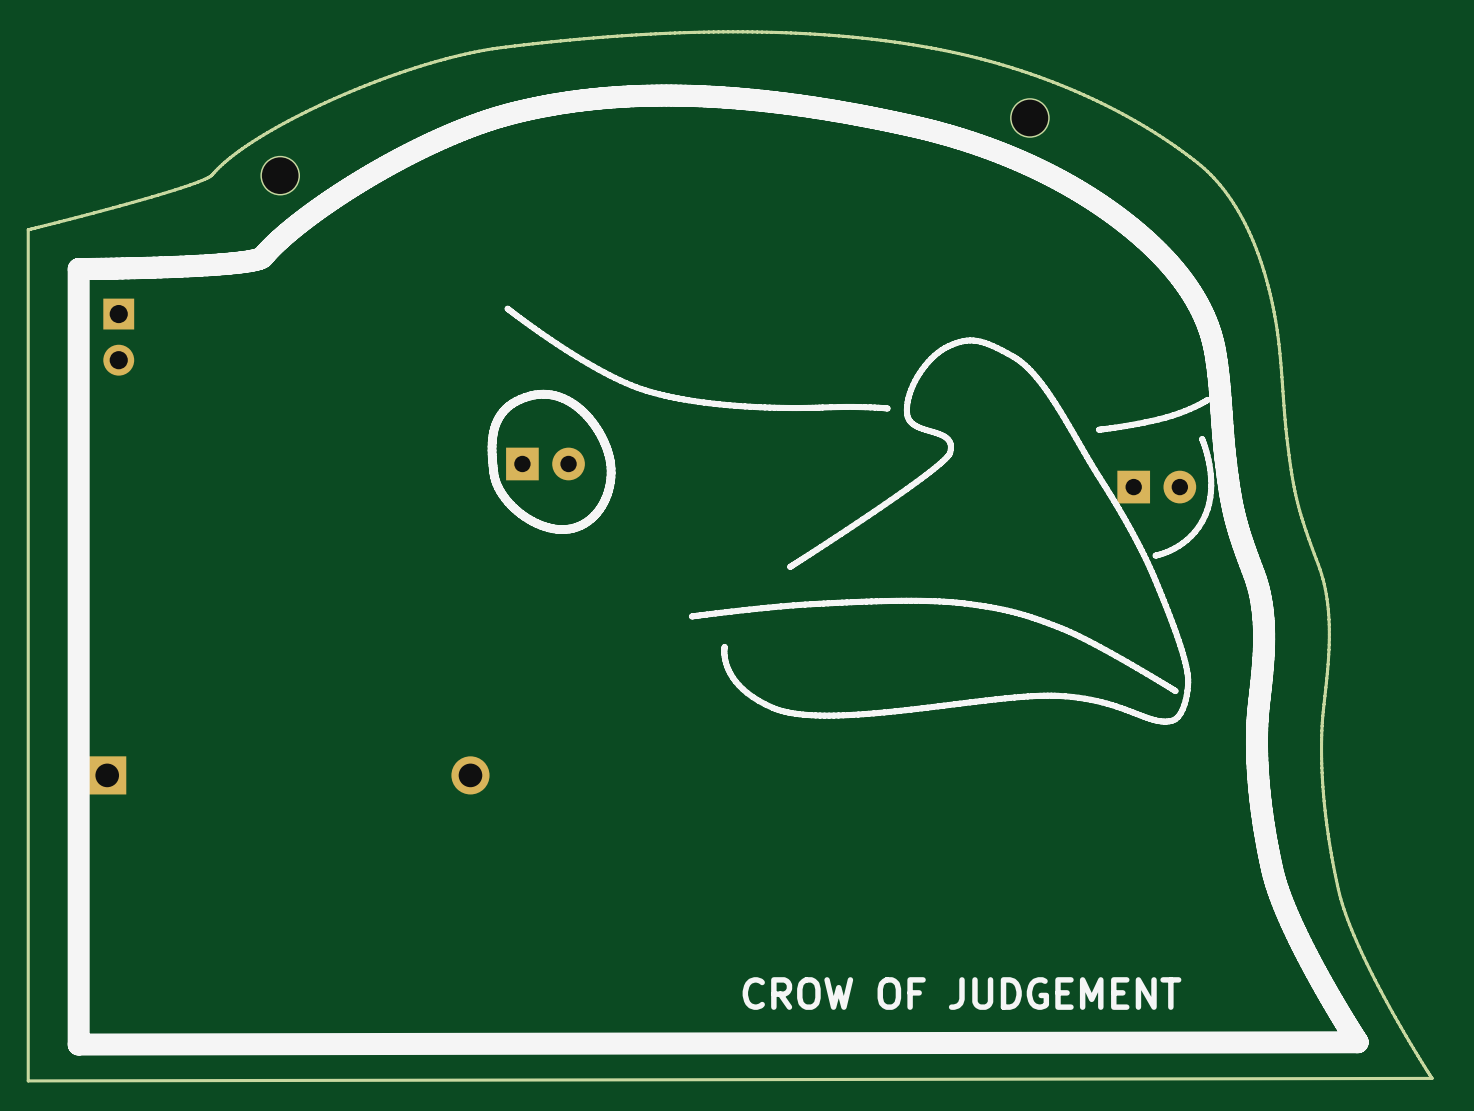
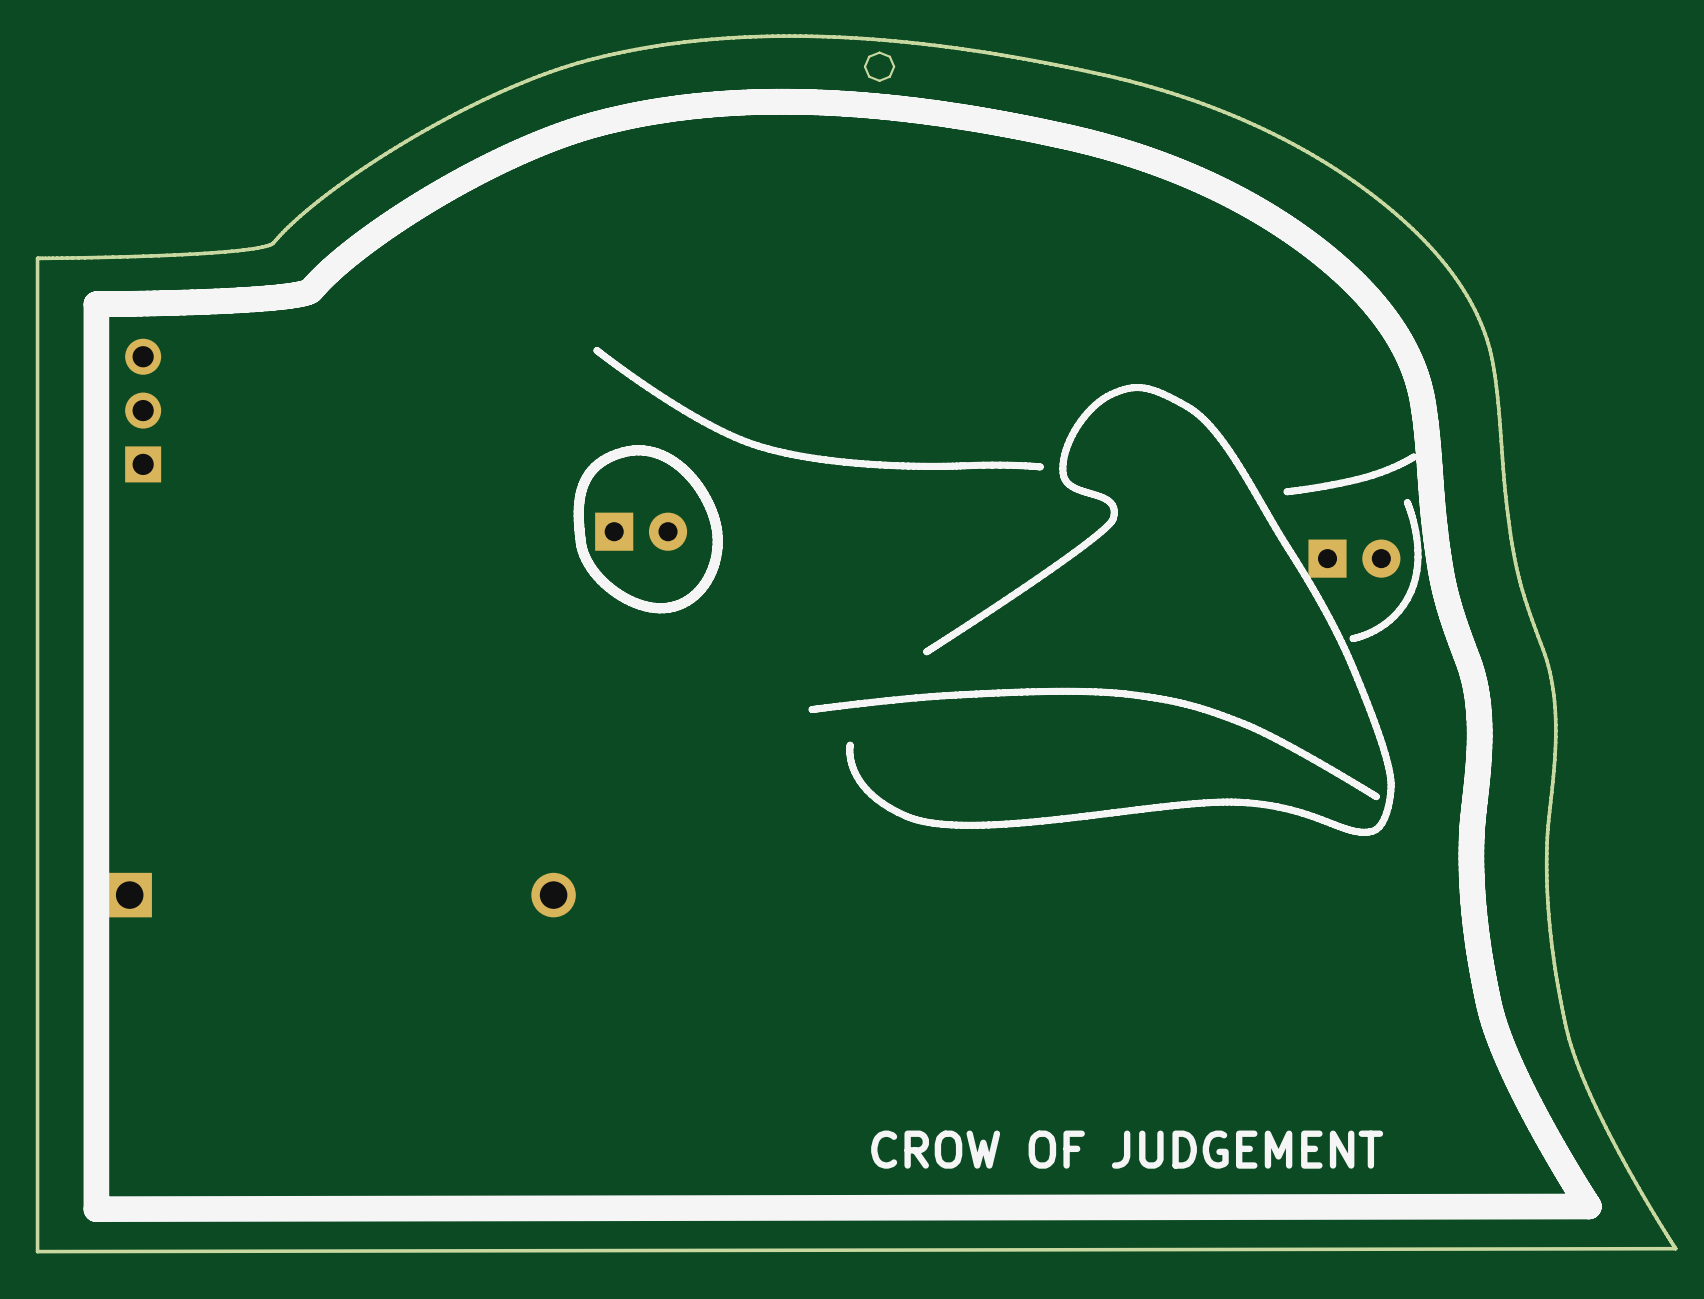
drawing shape: [26, 30, 1434, 1083] -> [35, 34, 1678, 1254]
part: (1029, 117) -> none
part: (280, 175) -> none
part: (118, 337) -> none
part: none -> (143, 410)

